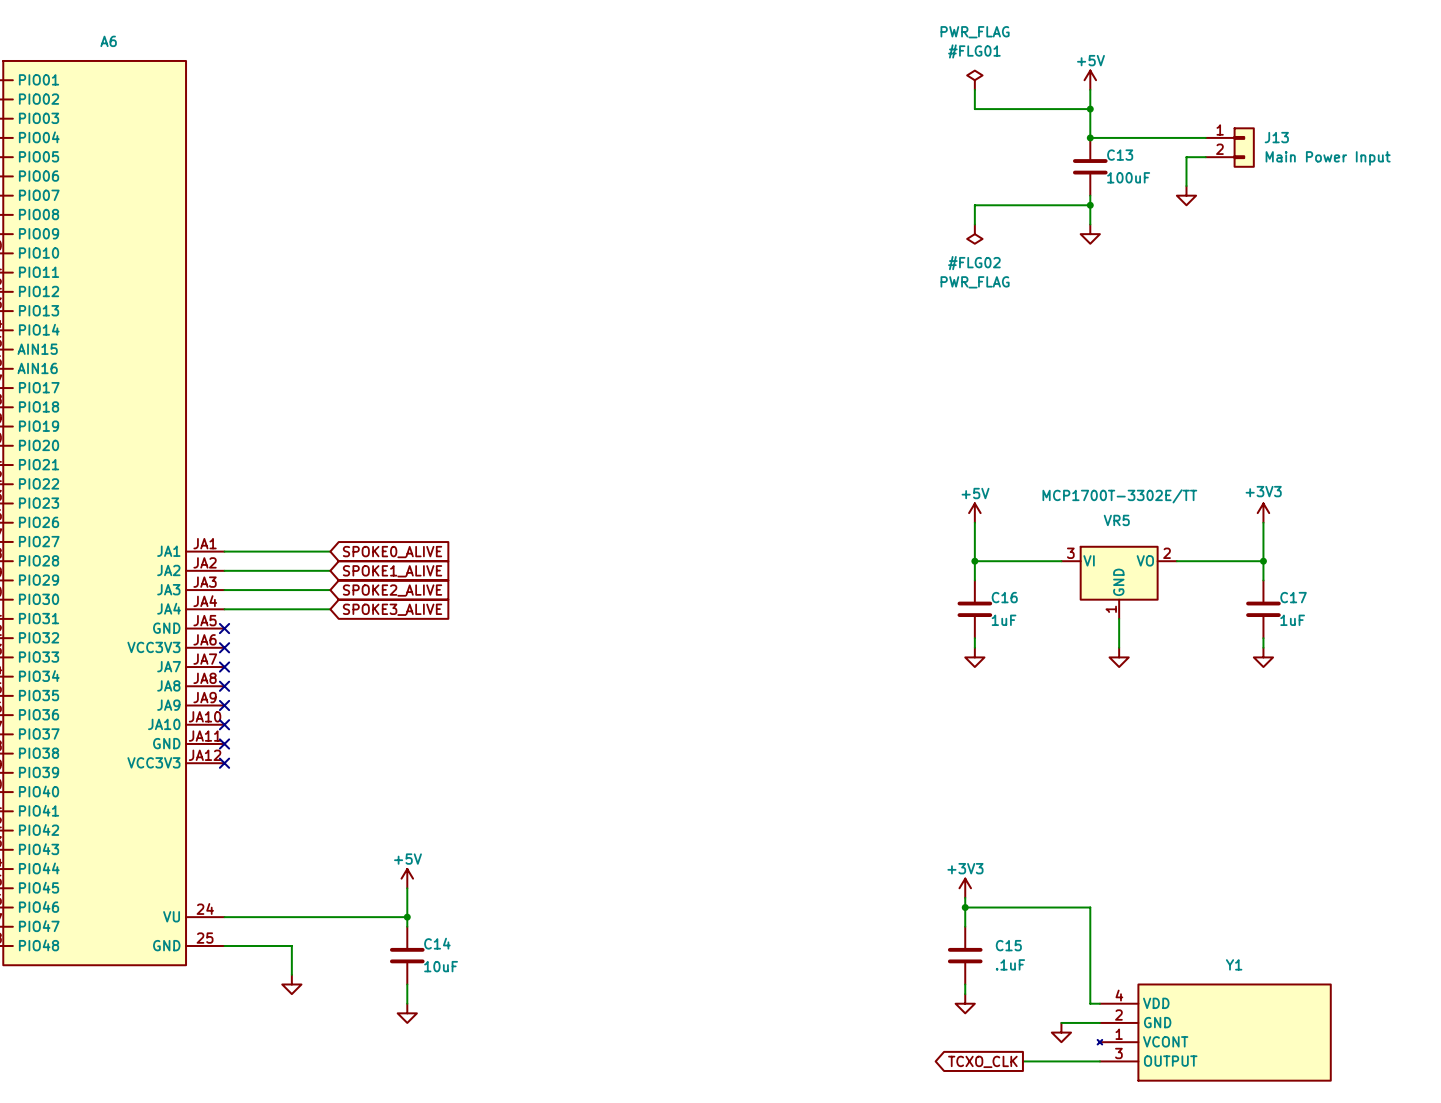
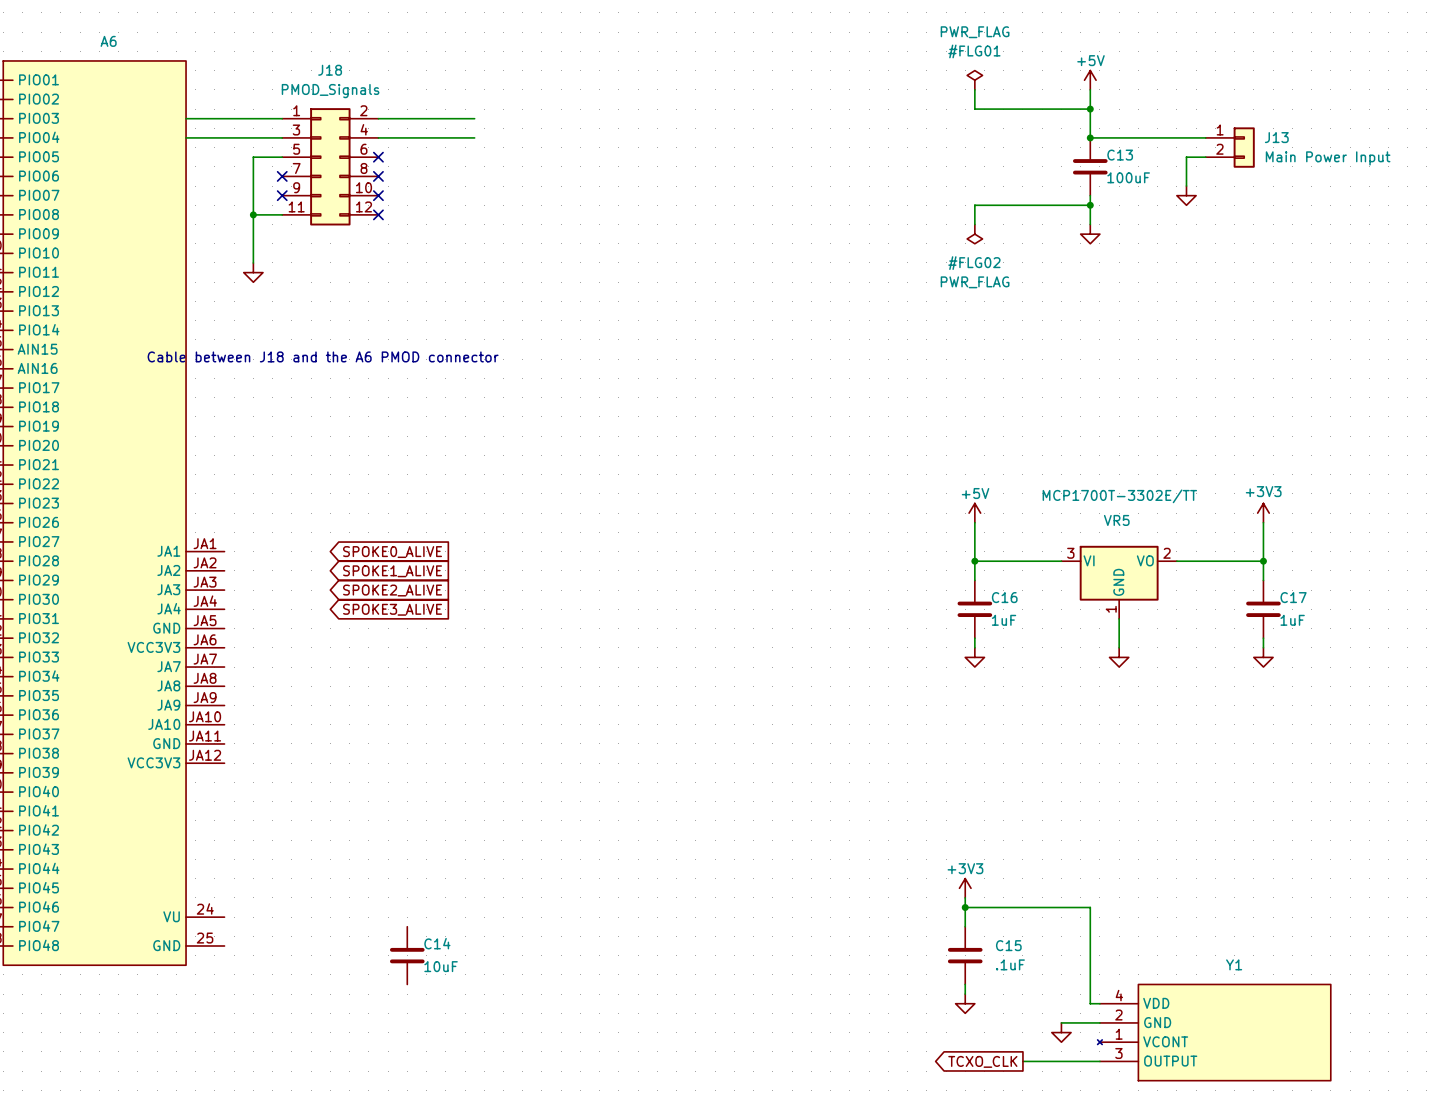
wire: none -> (186, 118) (282, 118)
wire: none -> (378, 118) (474, 118)
wire: none -> (186, 137) (282, 137)
wire: none -> (378, 137) (474, 137)
wire: none -> (282, 157) (253, 157) (253, 262)
no-connect mark: none -> (378, 157)
J18: none -> PMOD_Signals (330, 166)
no-connect mark: none -> (282, 176)
no-connect mark: none -> (378, 176)
no-connect mark: none -> (282, 195)
no-connect mark: none -> (378, 195)
wire: none -> (253, 214) (282, 214)
junction: none -> (253, 214)
no-connect mark: none -> (378, 214)
power symbol: none -> (253, 272)
text: none -> Cable between J18 and the A6 PMOD connector (323, 356)
wire: (224, 551) (330, 551) -> none
wire: (224, 570) (330, 570) -> none
wire: (224, 590) (330, 590) -> none
wire: (224, 609) (330, 609) -> none
no-connect mark: (224, 628) -> none
no-connect mark: (224, 647) -> none
no-connect mark: (224, 667) -> none
no-connect mark: (224, 686) -> none
no-connect mark: (224, 705) -> none
no-connect mark: (224, 724) -> none
no-connect mark: (224, 743) -> none
no-connect mark: (224, 763) -> none
power symbol: +5V (407, 878) -> none
wire: (407, 888) (407, 926) -> none
wire: (224, 917) (407, 917) -> none
junction: (407, 917) -> none
wire: (224, 945) (291, 945) (291, 974) -> none
power symbol: (291, 984) -> none
wire: (407, 984) (407, 1003) -> none
power symbol: (407, 1013) -> none

